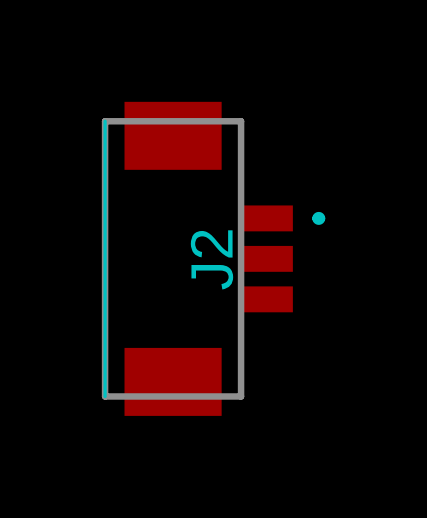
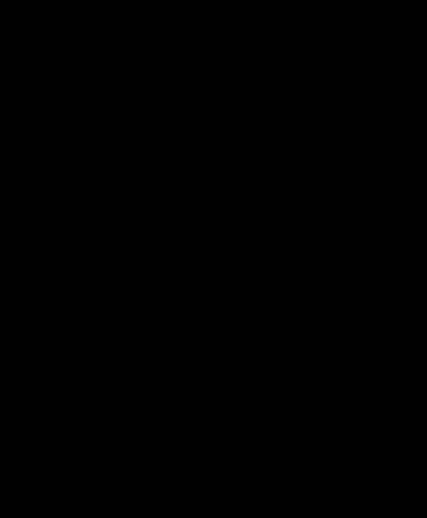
J2: (213, 258) -> none

